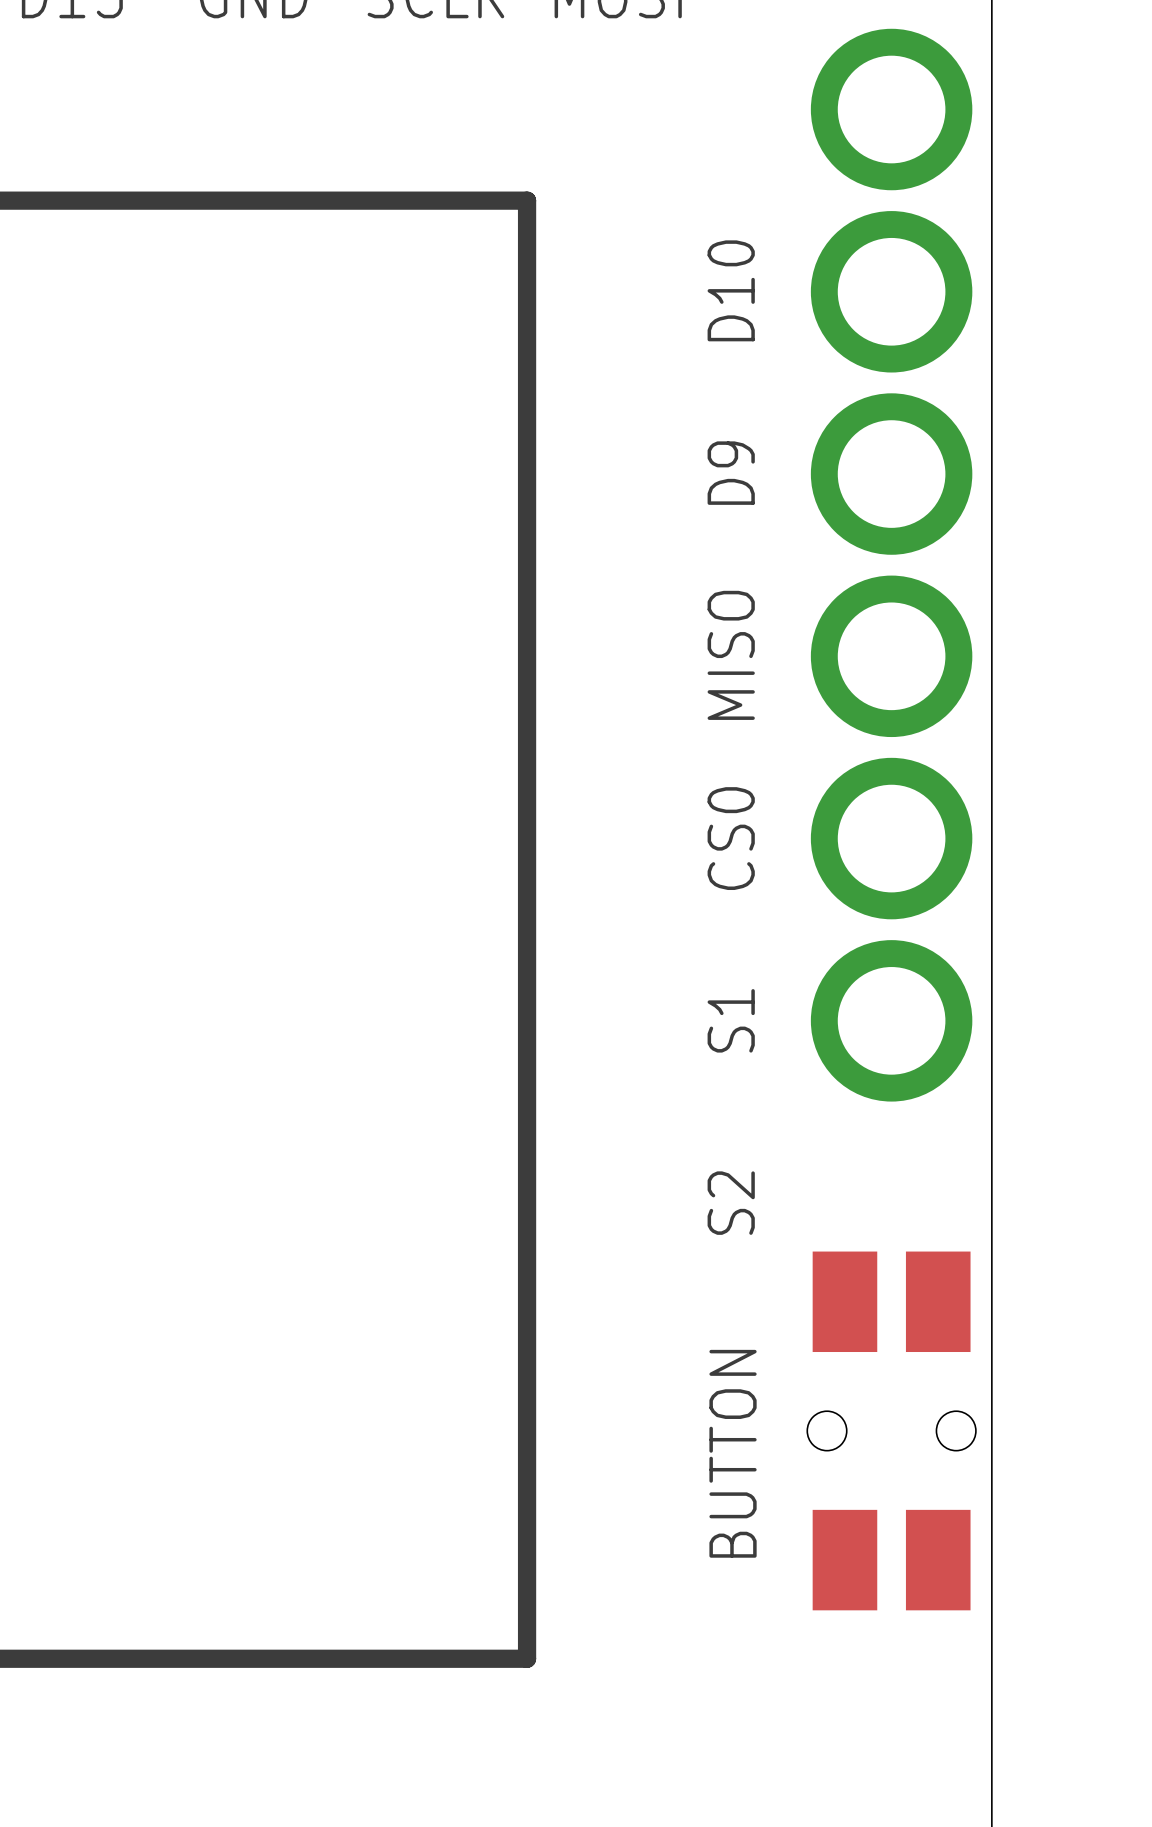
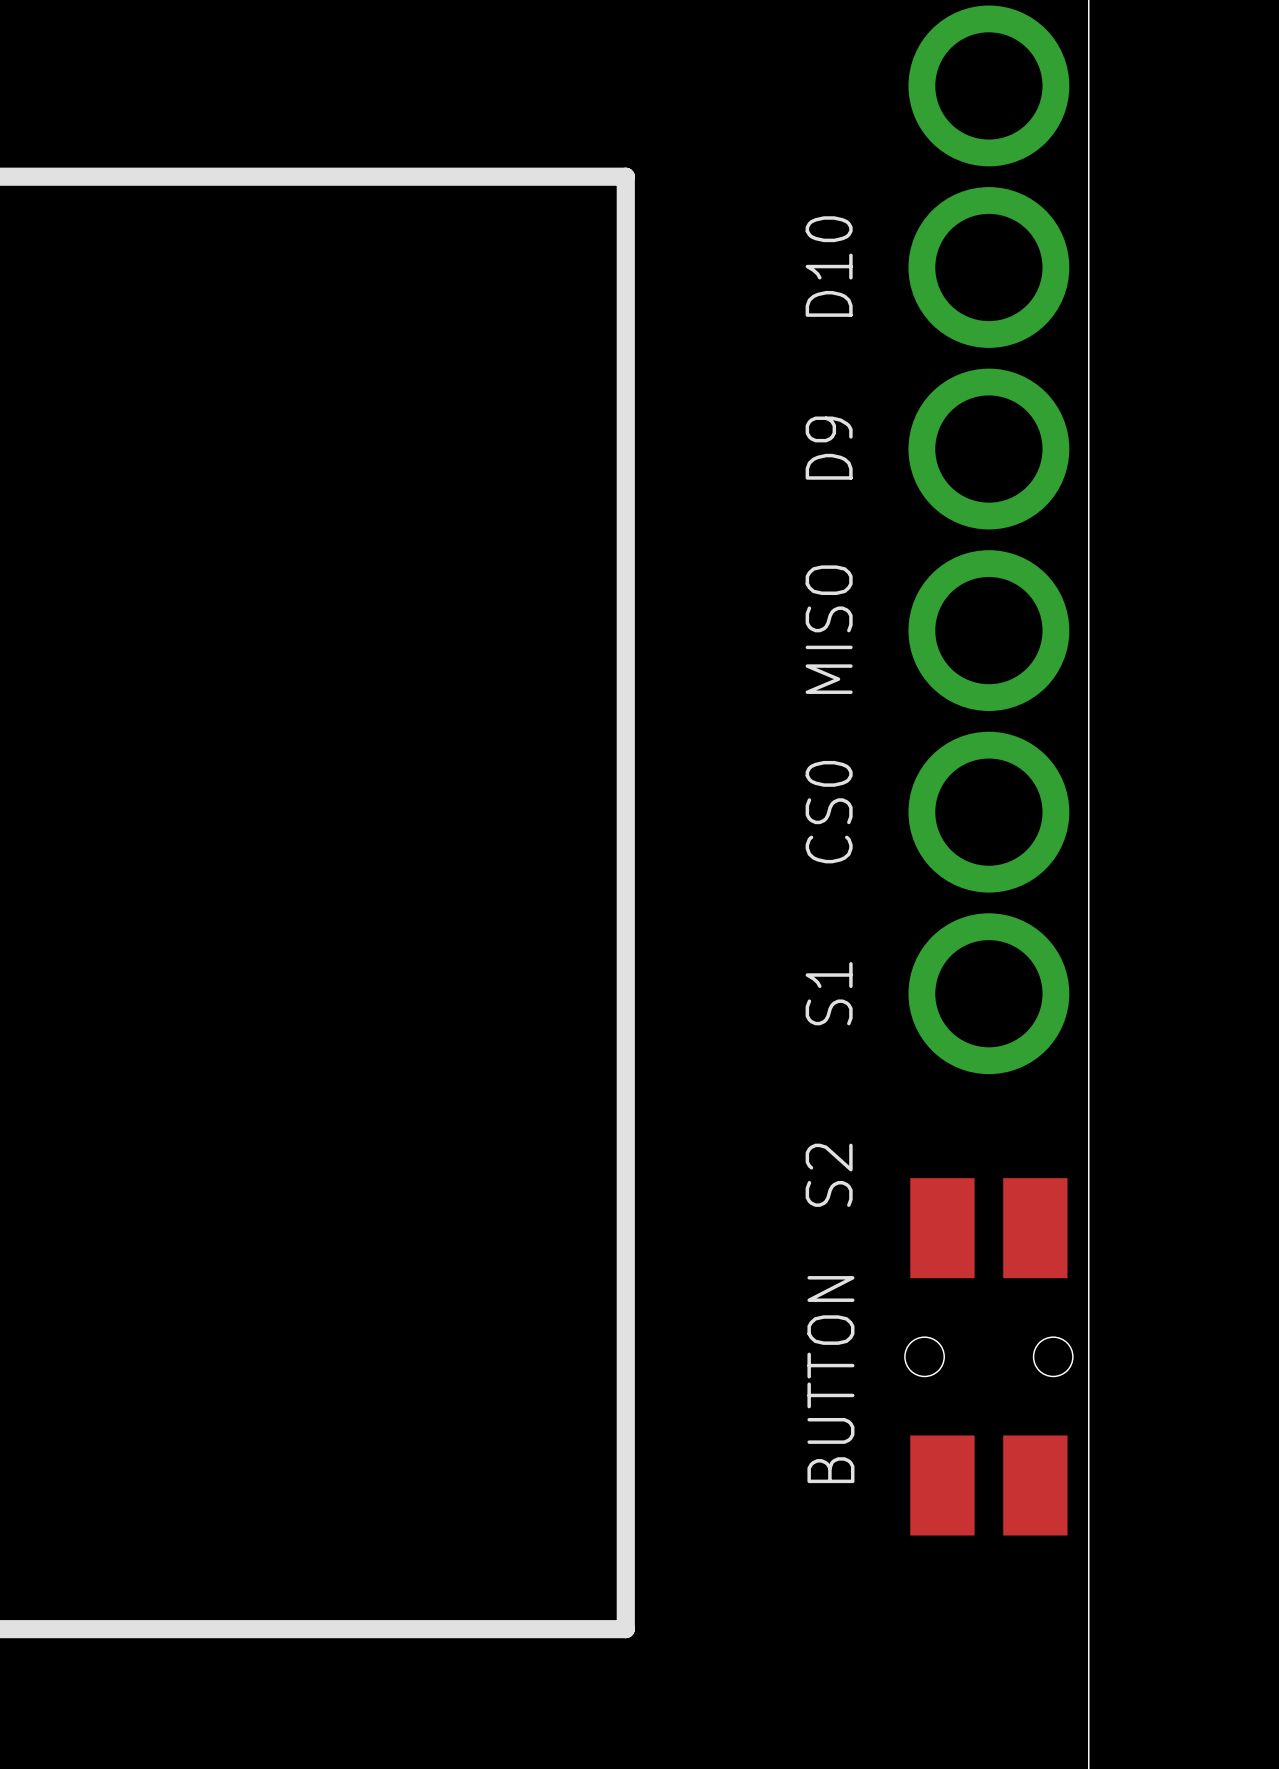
BUTTON position: (891, 1430) -> (988, 1356)

